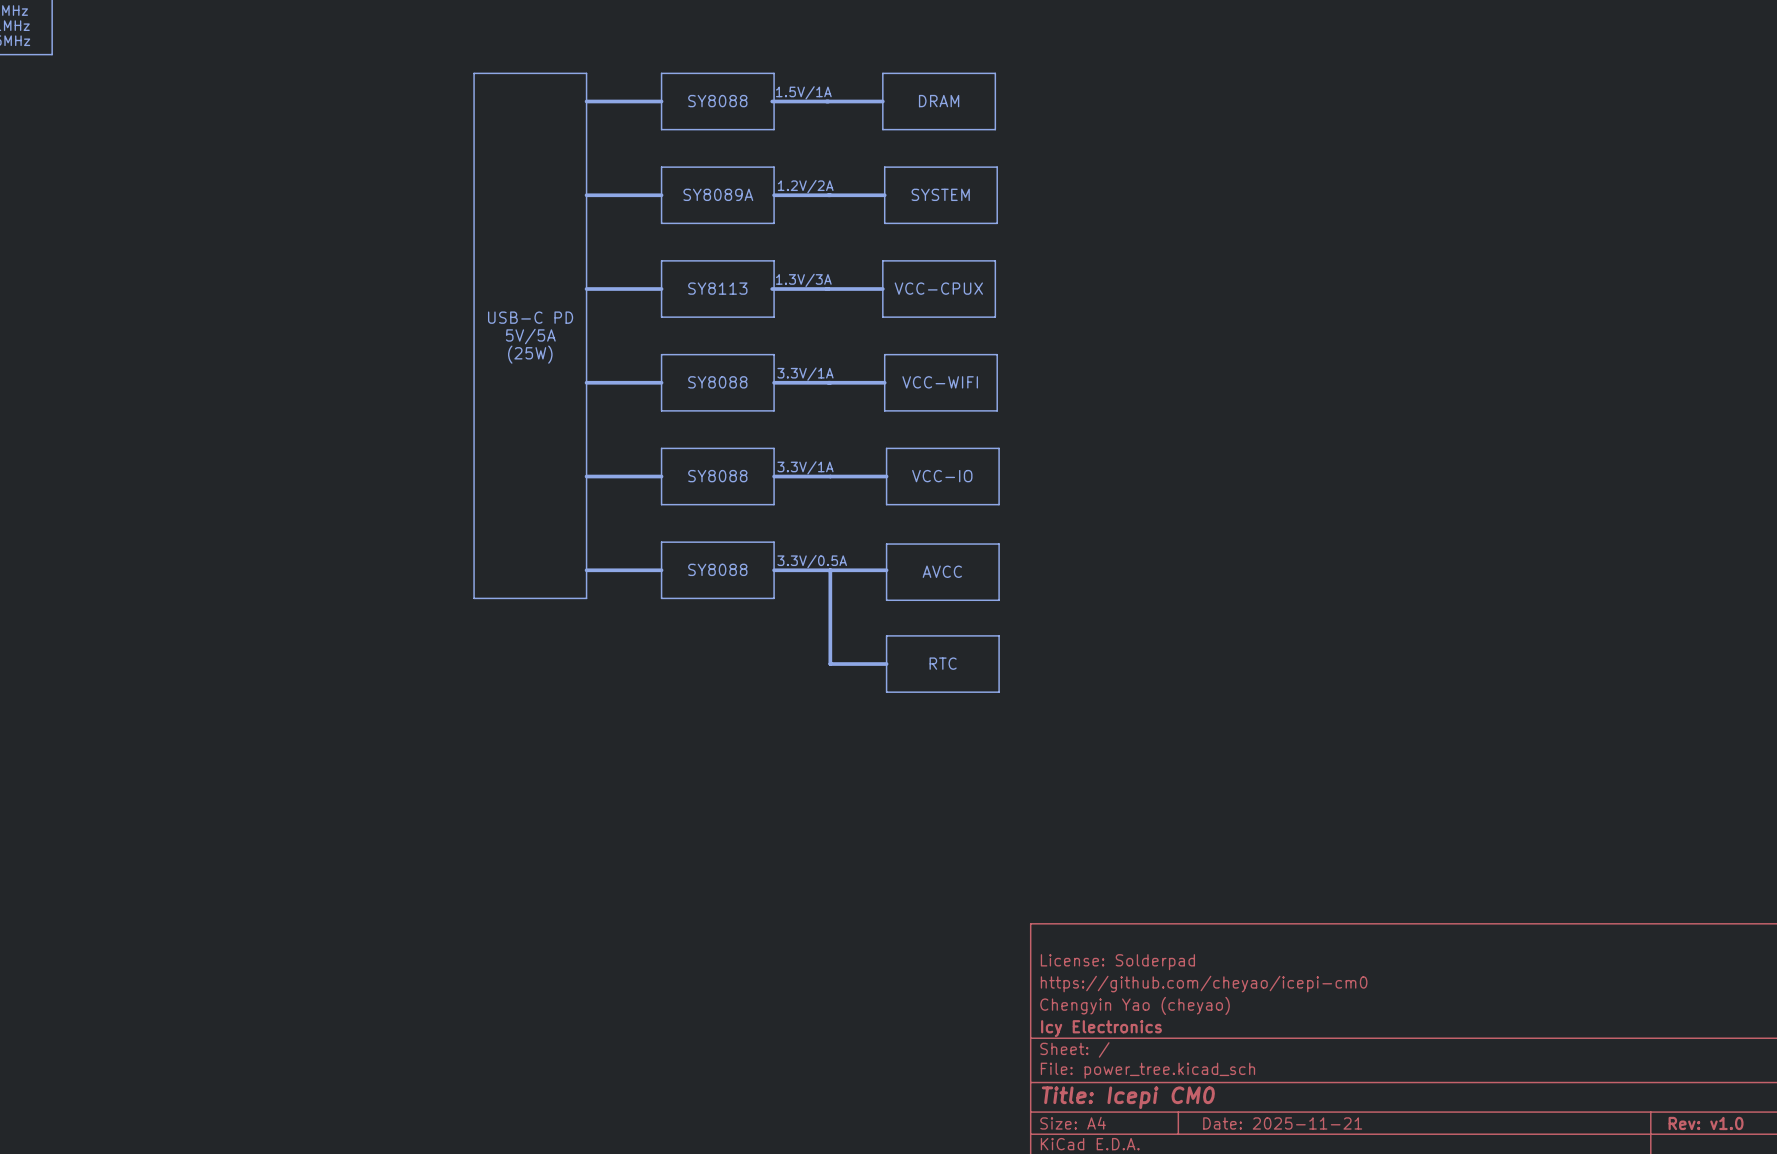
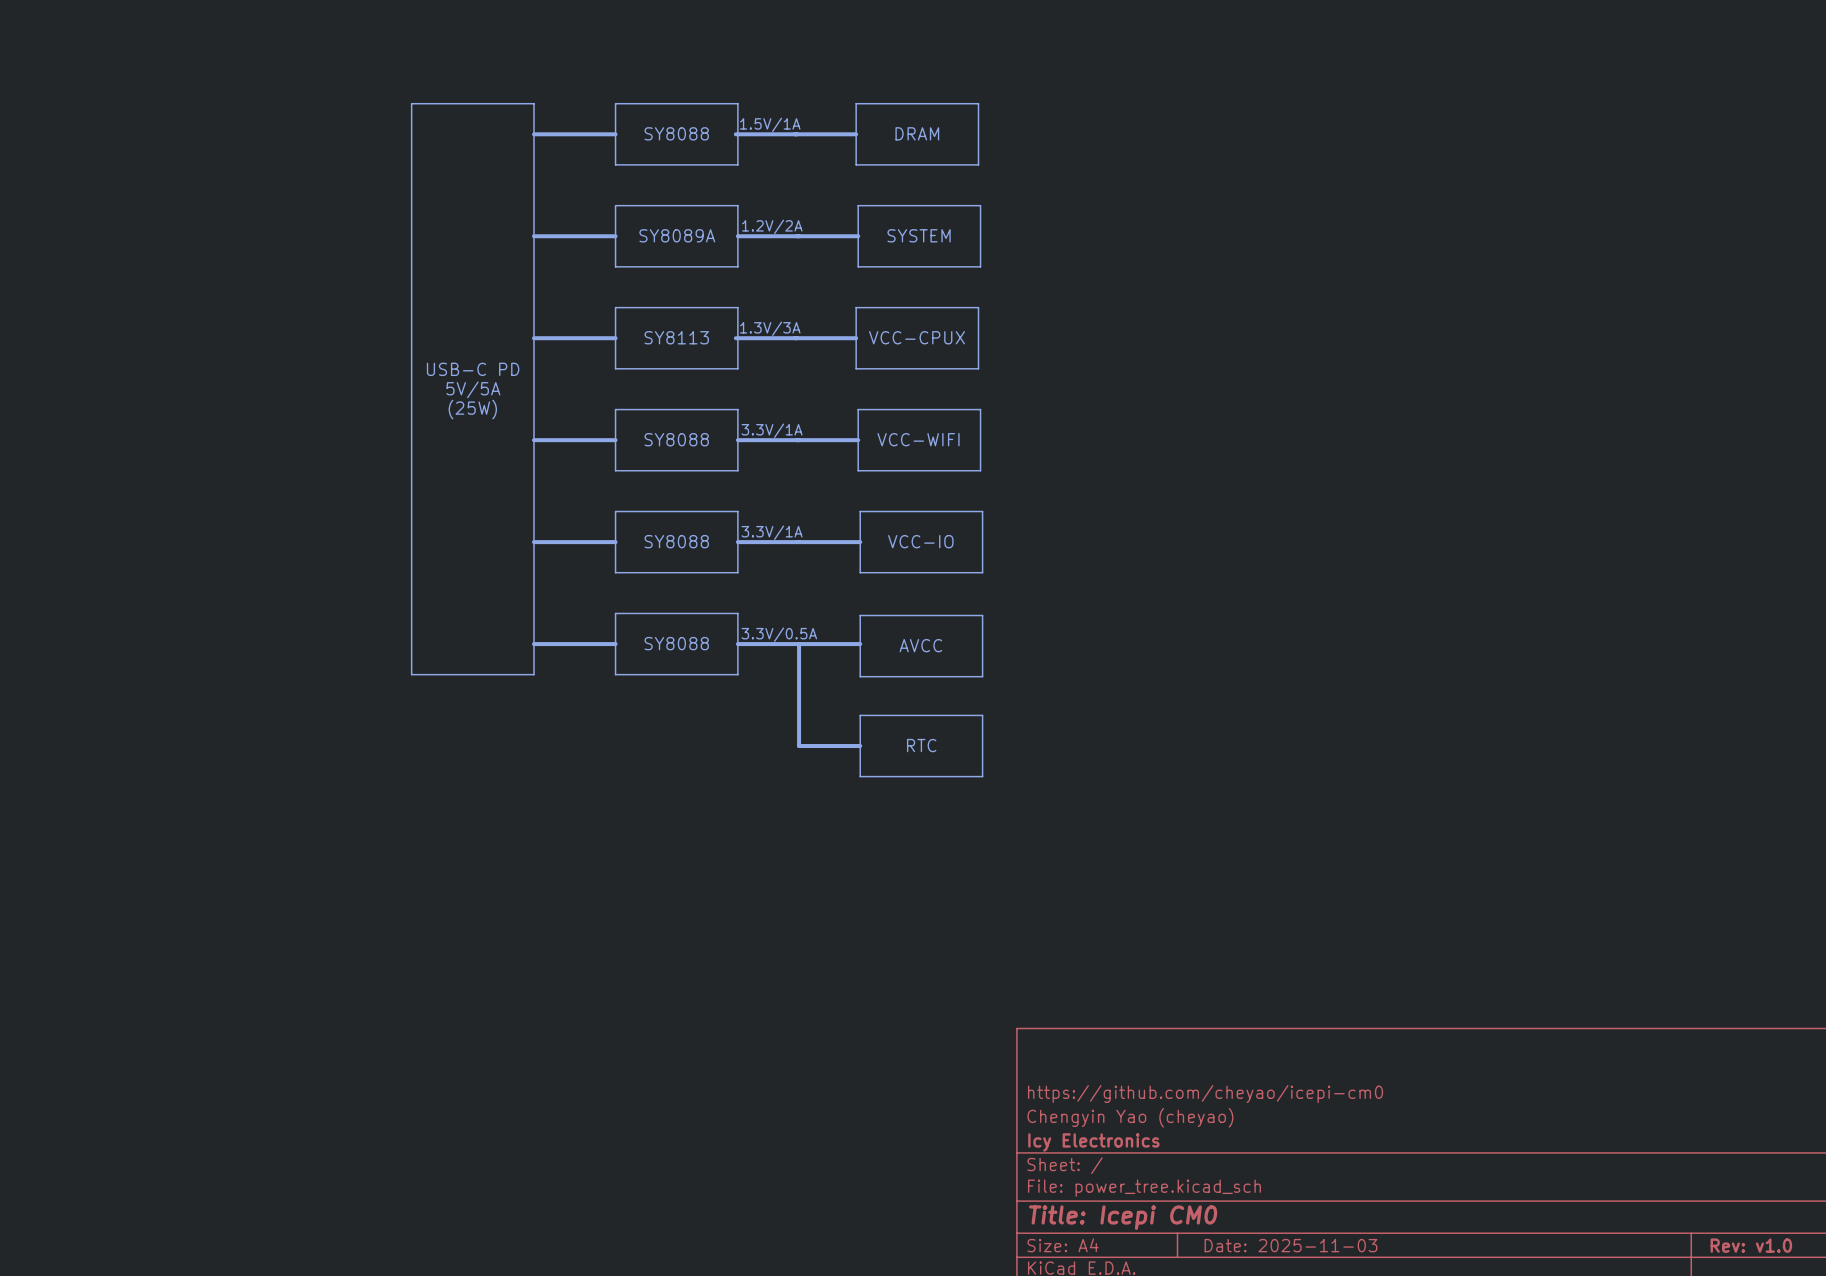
title block: License: Solderpad (1117, 962) -> none
title block: Date: 2025-11-21 (1282, 1123) -> Date: 2025-11-03 (1290, 1245)

